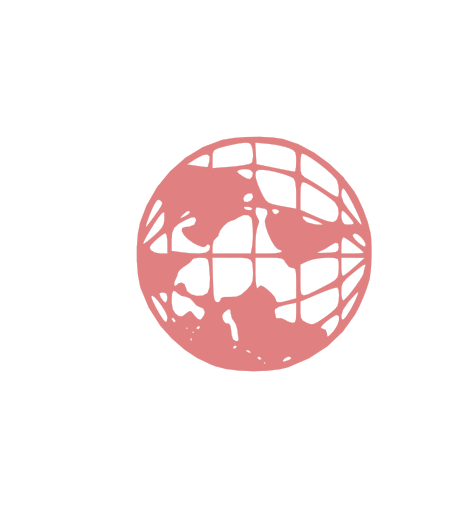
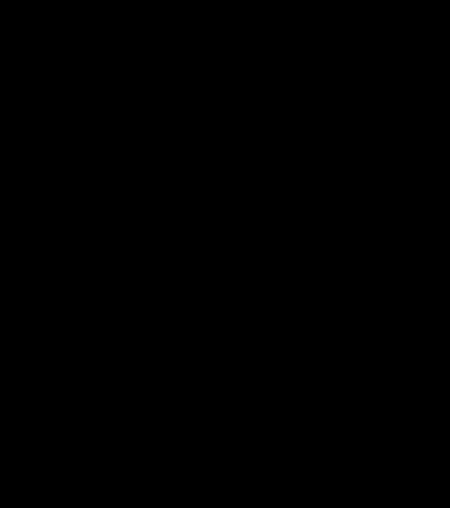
part: (254, 254) -> none

